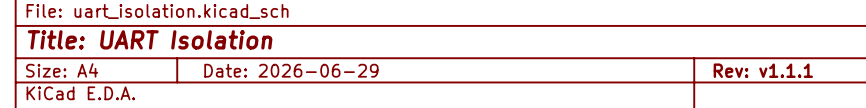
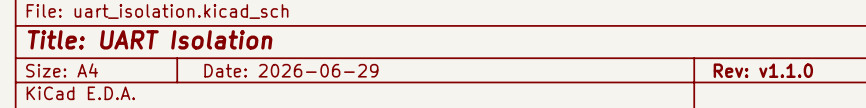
title block: Rev: v1.1.1 (763, 70) -> Rev: v1.1.0 (763, 70)

